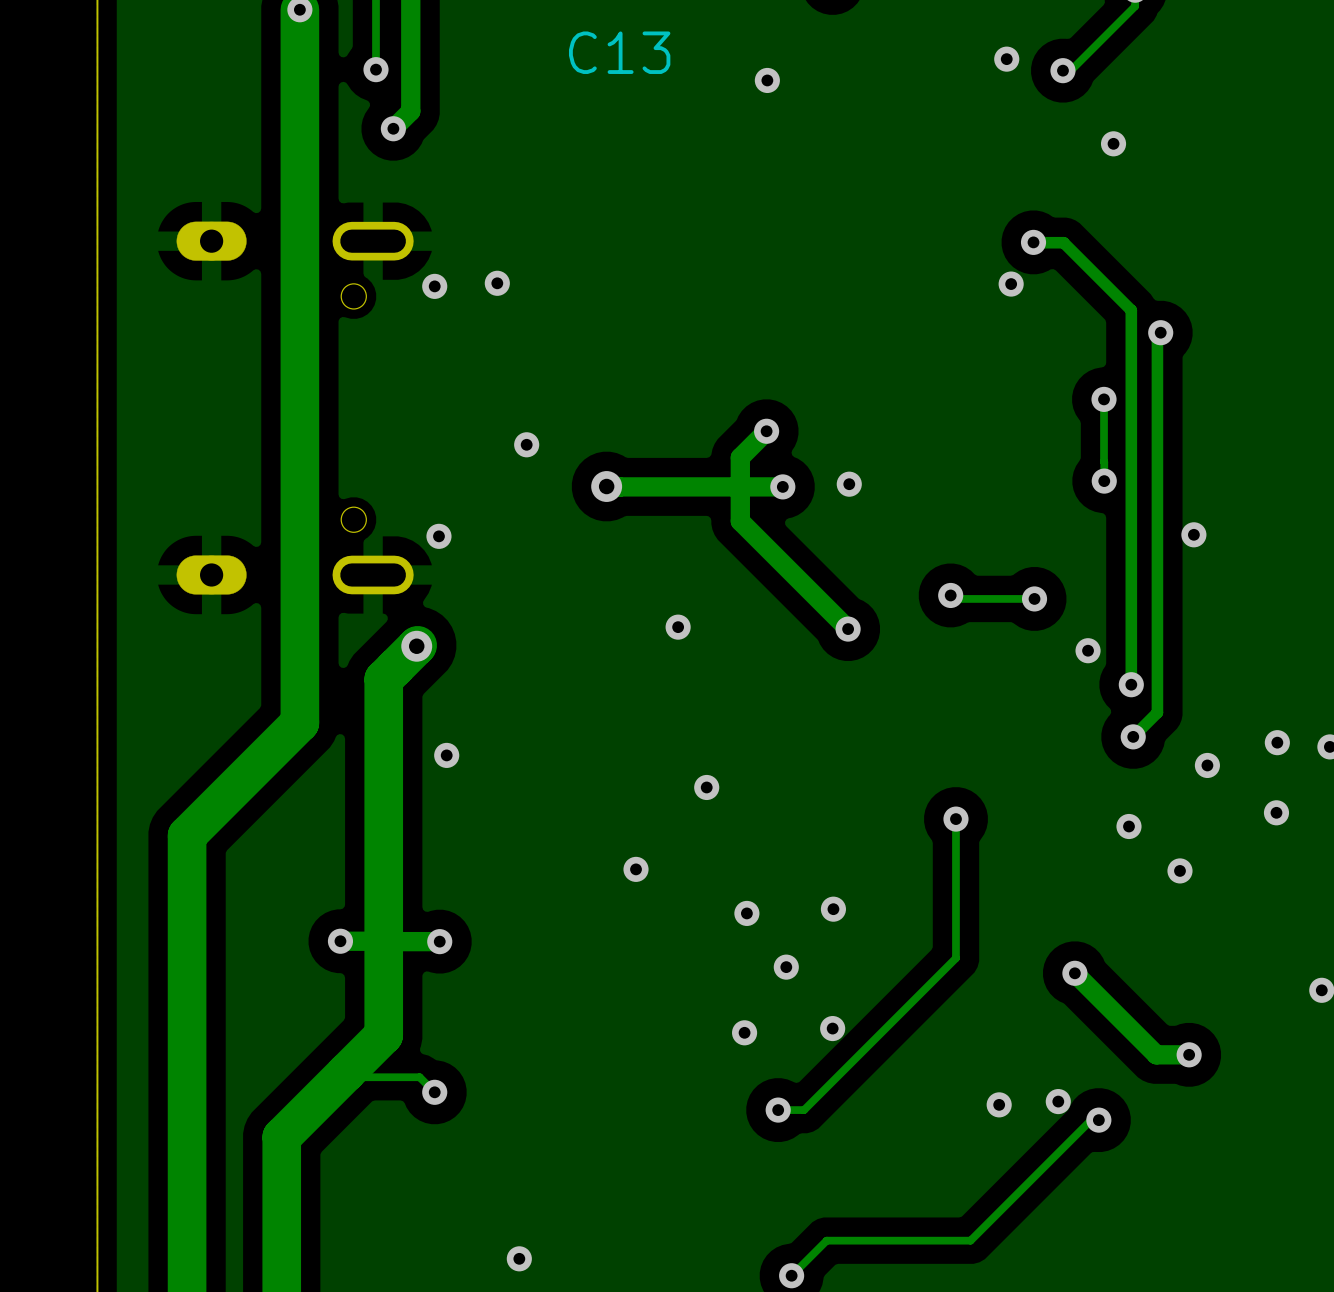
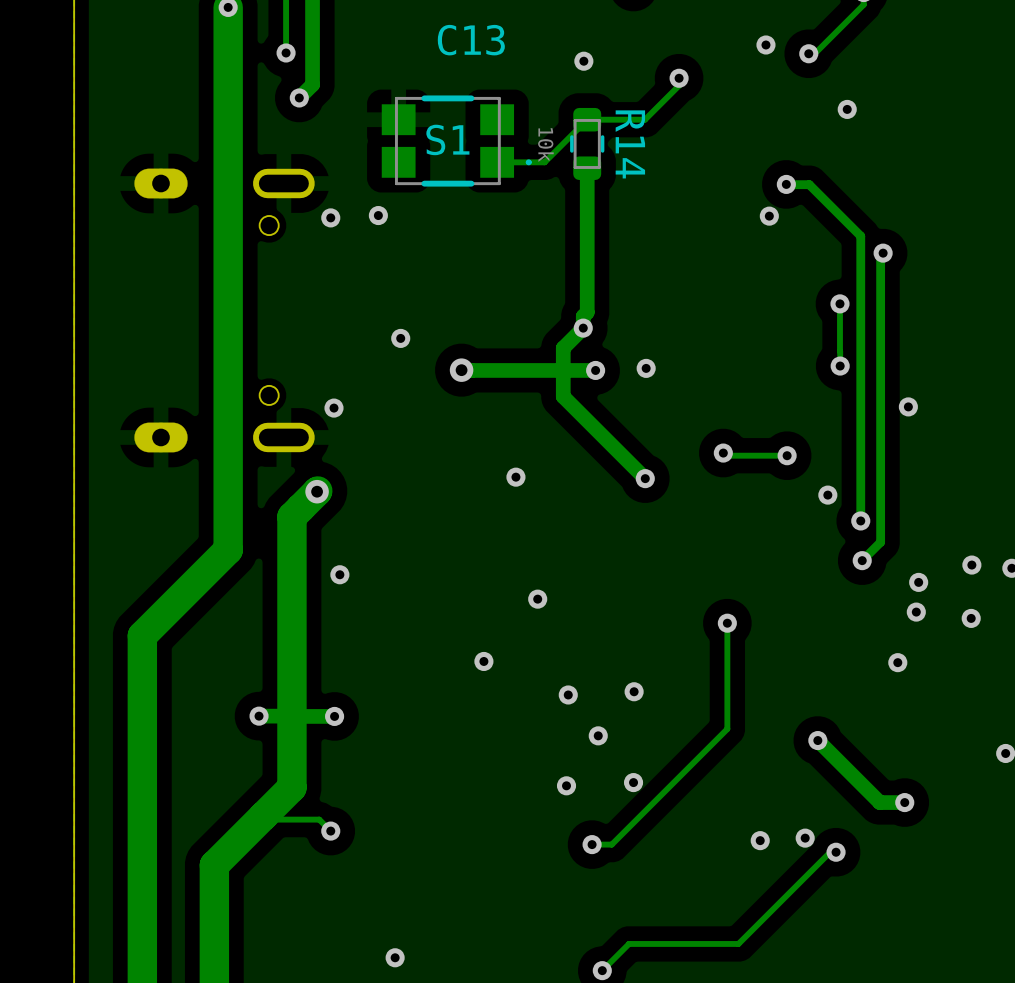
track: none -> (679, 78) (679, 85) (644, 119) (587, 119) (544, 162) (497, 162)
via: none -> (679, 78)
S1: none -> (456, 141)
R14: none -> 10k (587, 143)
track: none -> (587, 168) (587, 312) (583, 316) (583, 328)
via position: (1128, 826) -> (916, 612)

